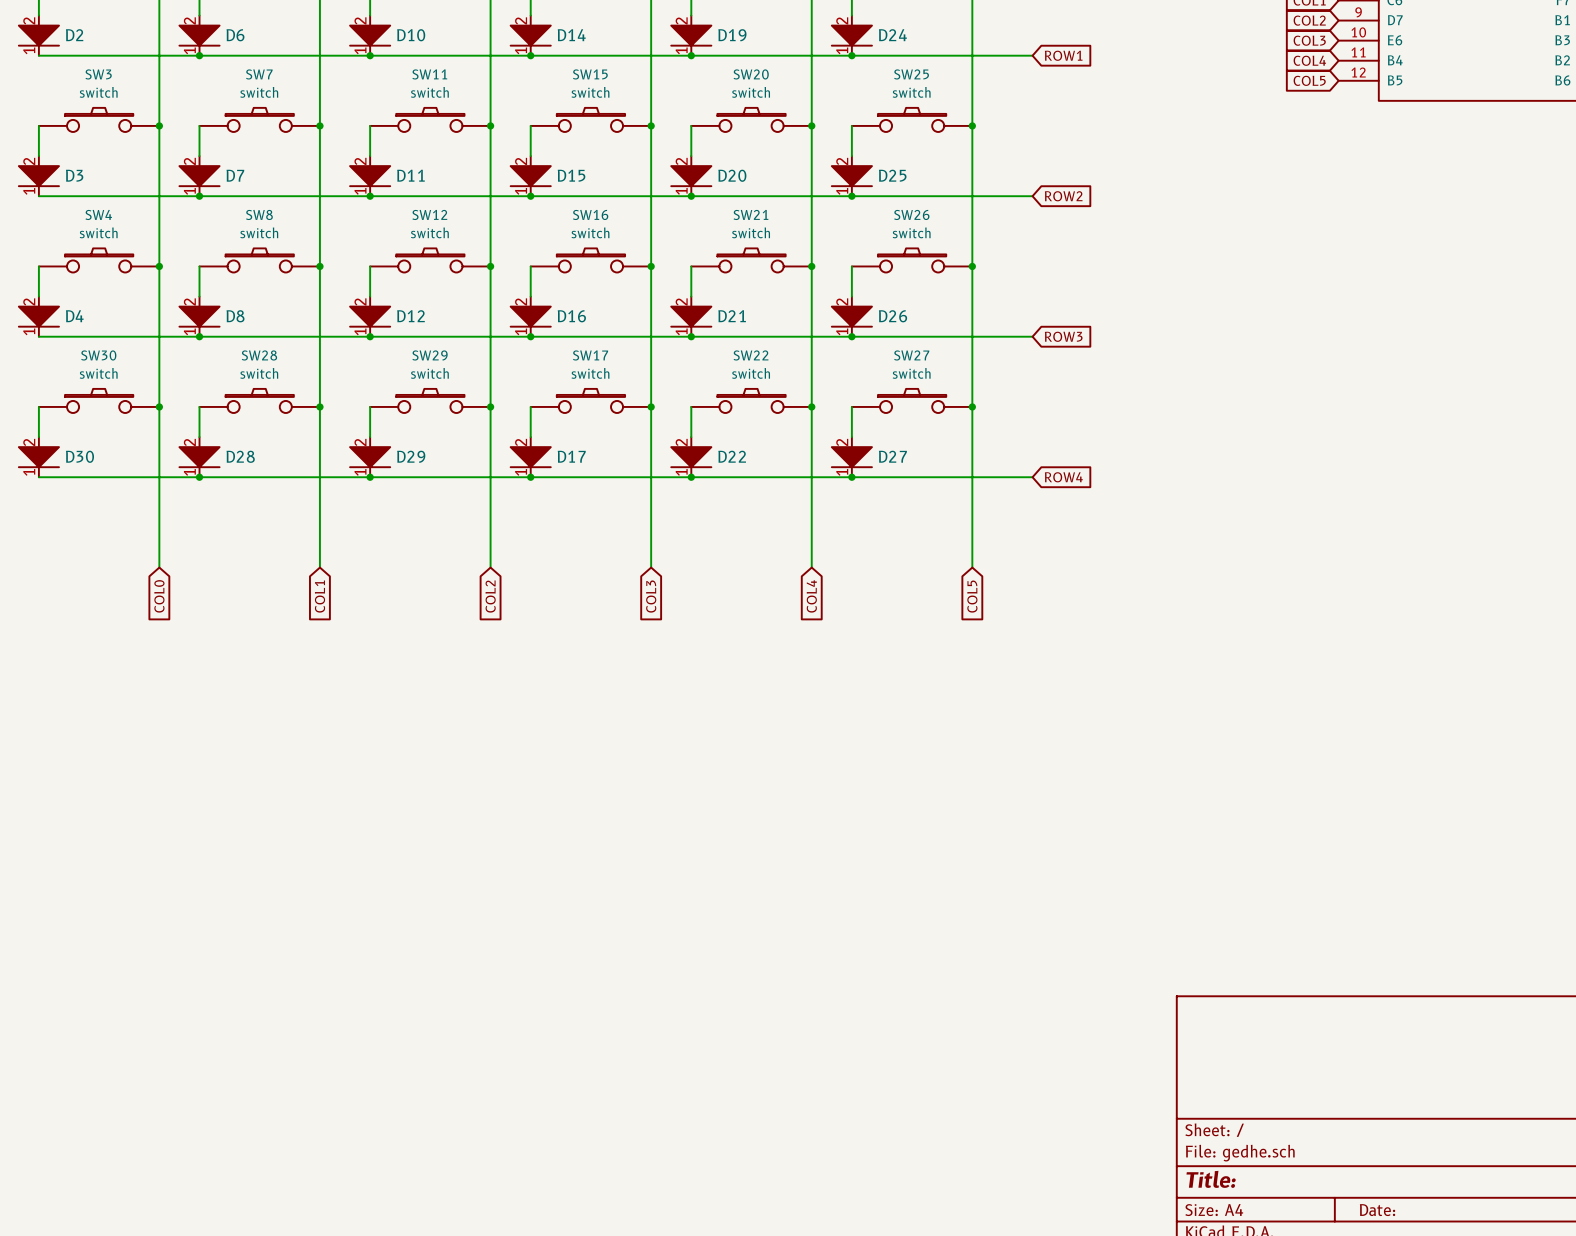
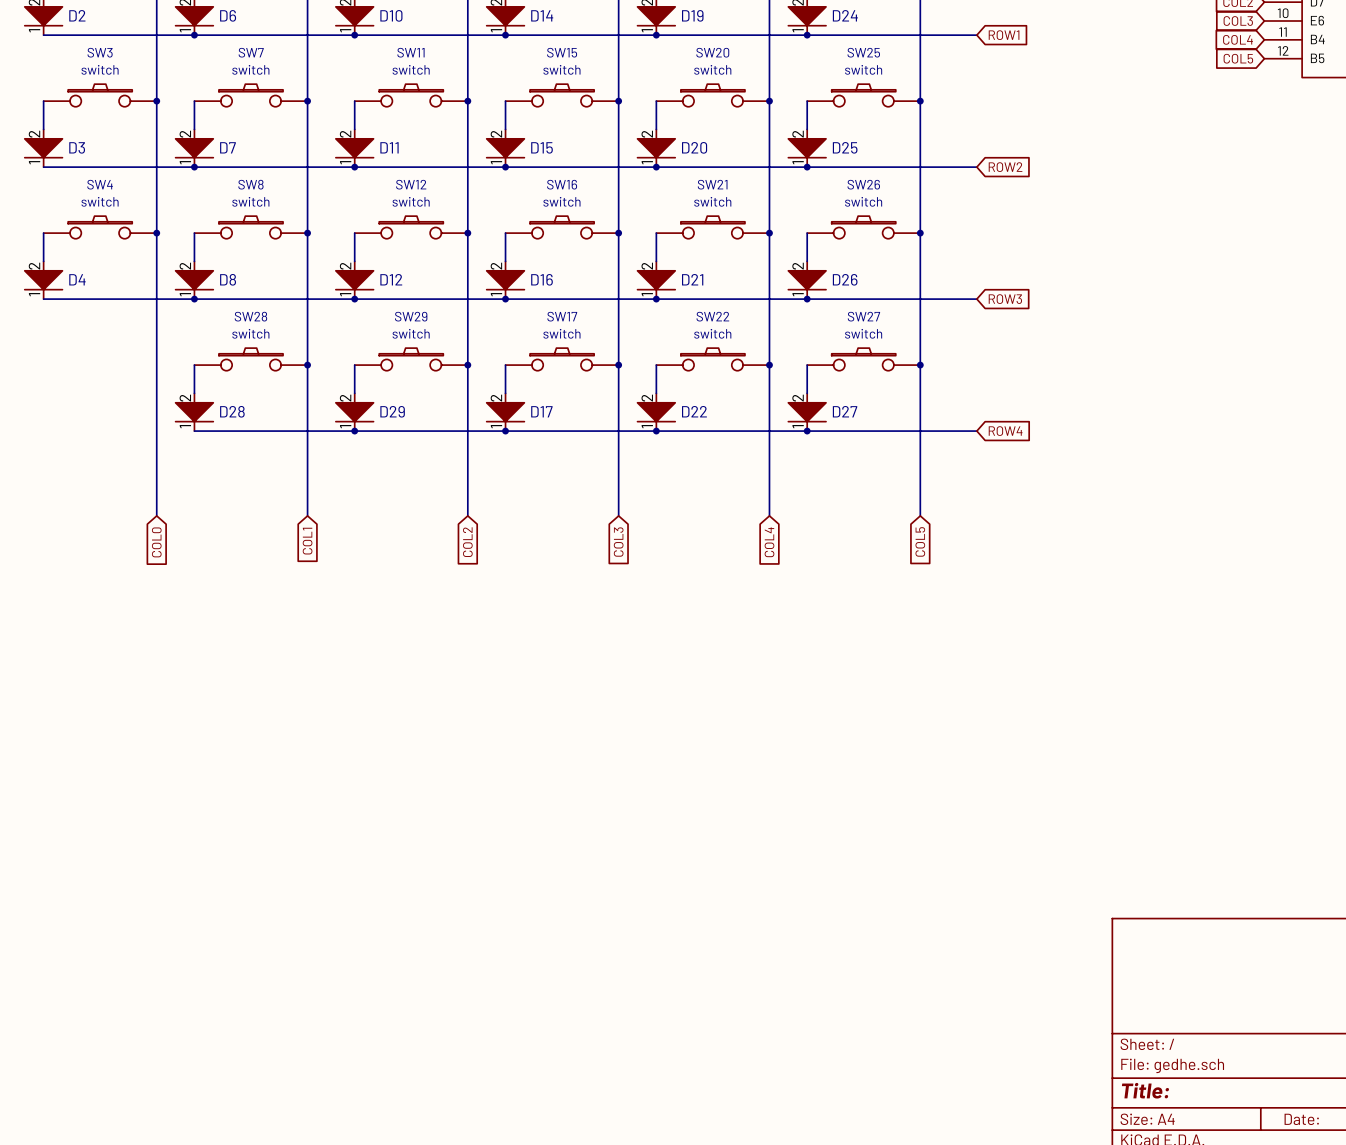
SW30: switch (99, 400) -> none
wire: (38, 406) (38, 437) -> none
junction: (159, 406) -> none
D30: (38, 457) -> none
wire: (38, 477) (199, 477) -> none
junction: (199, 477) -> none

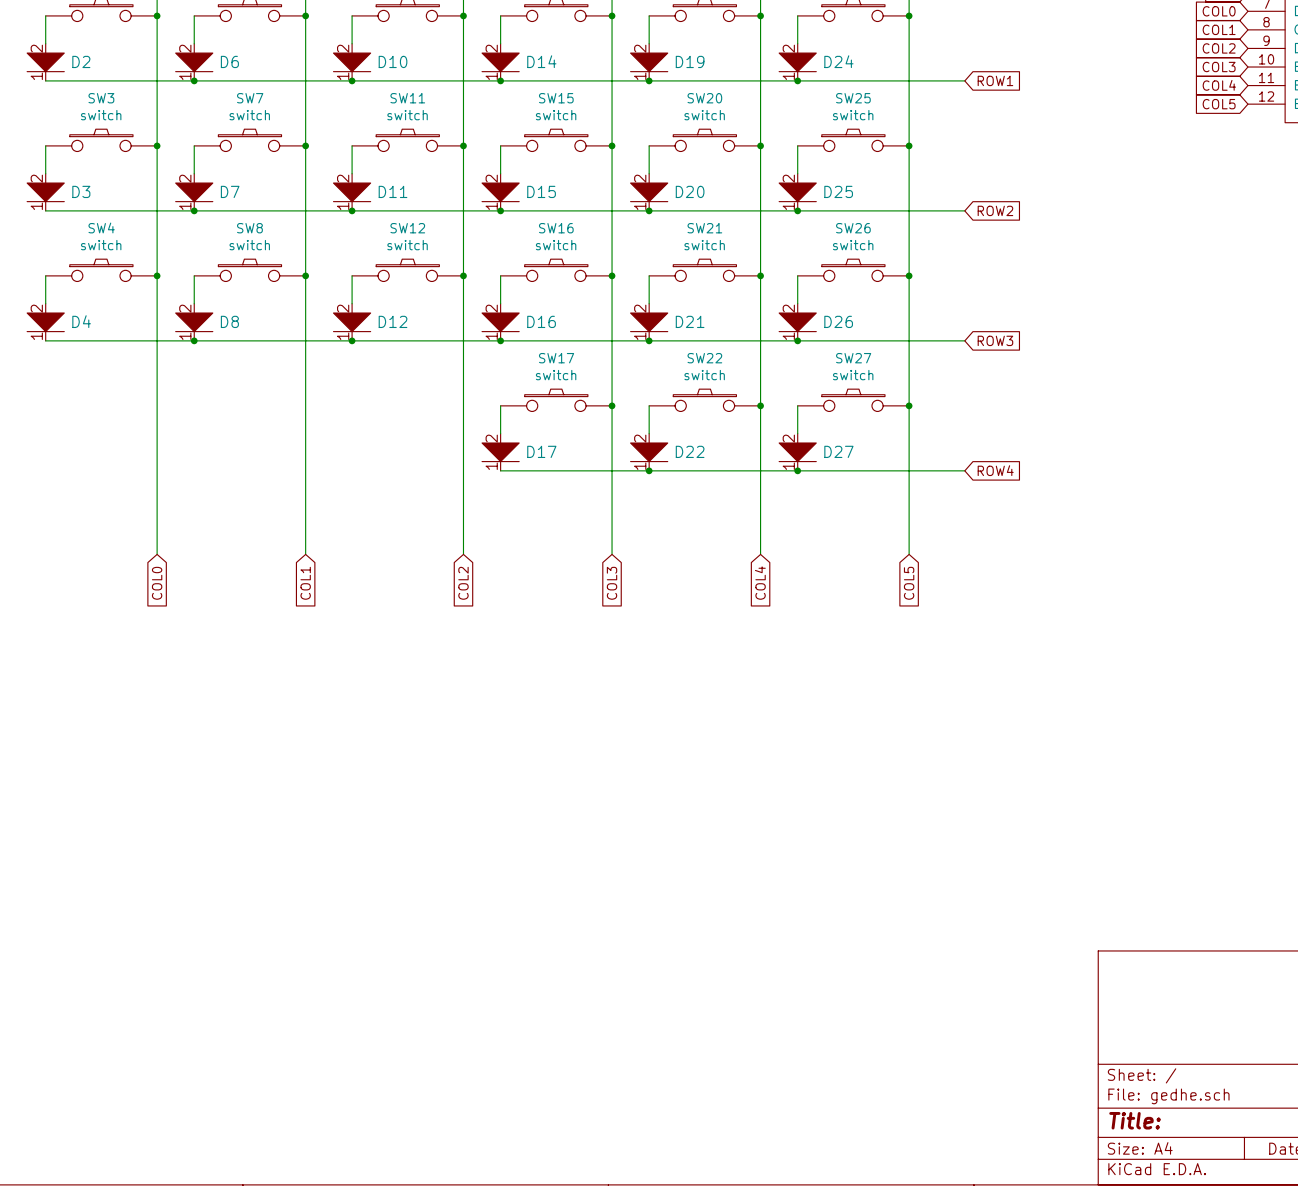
SW28: switch (251, 359) -> none
SW29: switch (411, 359) -> none
wire: (194, 365) (194, 393) -> none
junction: (307, 365) -> none
wire: (354, 365) (354, 393) -> none
junction: (467, 365) -> none
D28: (194, 412) -> none
D29: (354, 412) -> none
wire: (194, 431) (505, 431) -> none
junction: (354, 431) -> none
junction: (505, 431) -> none

